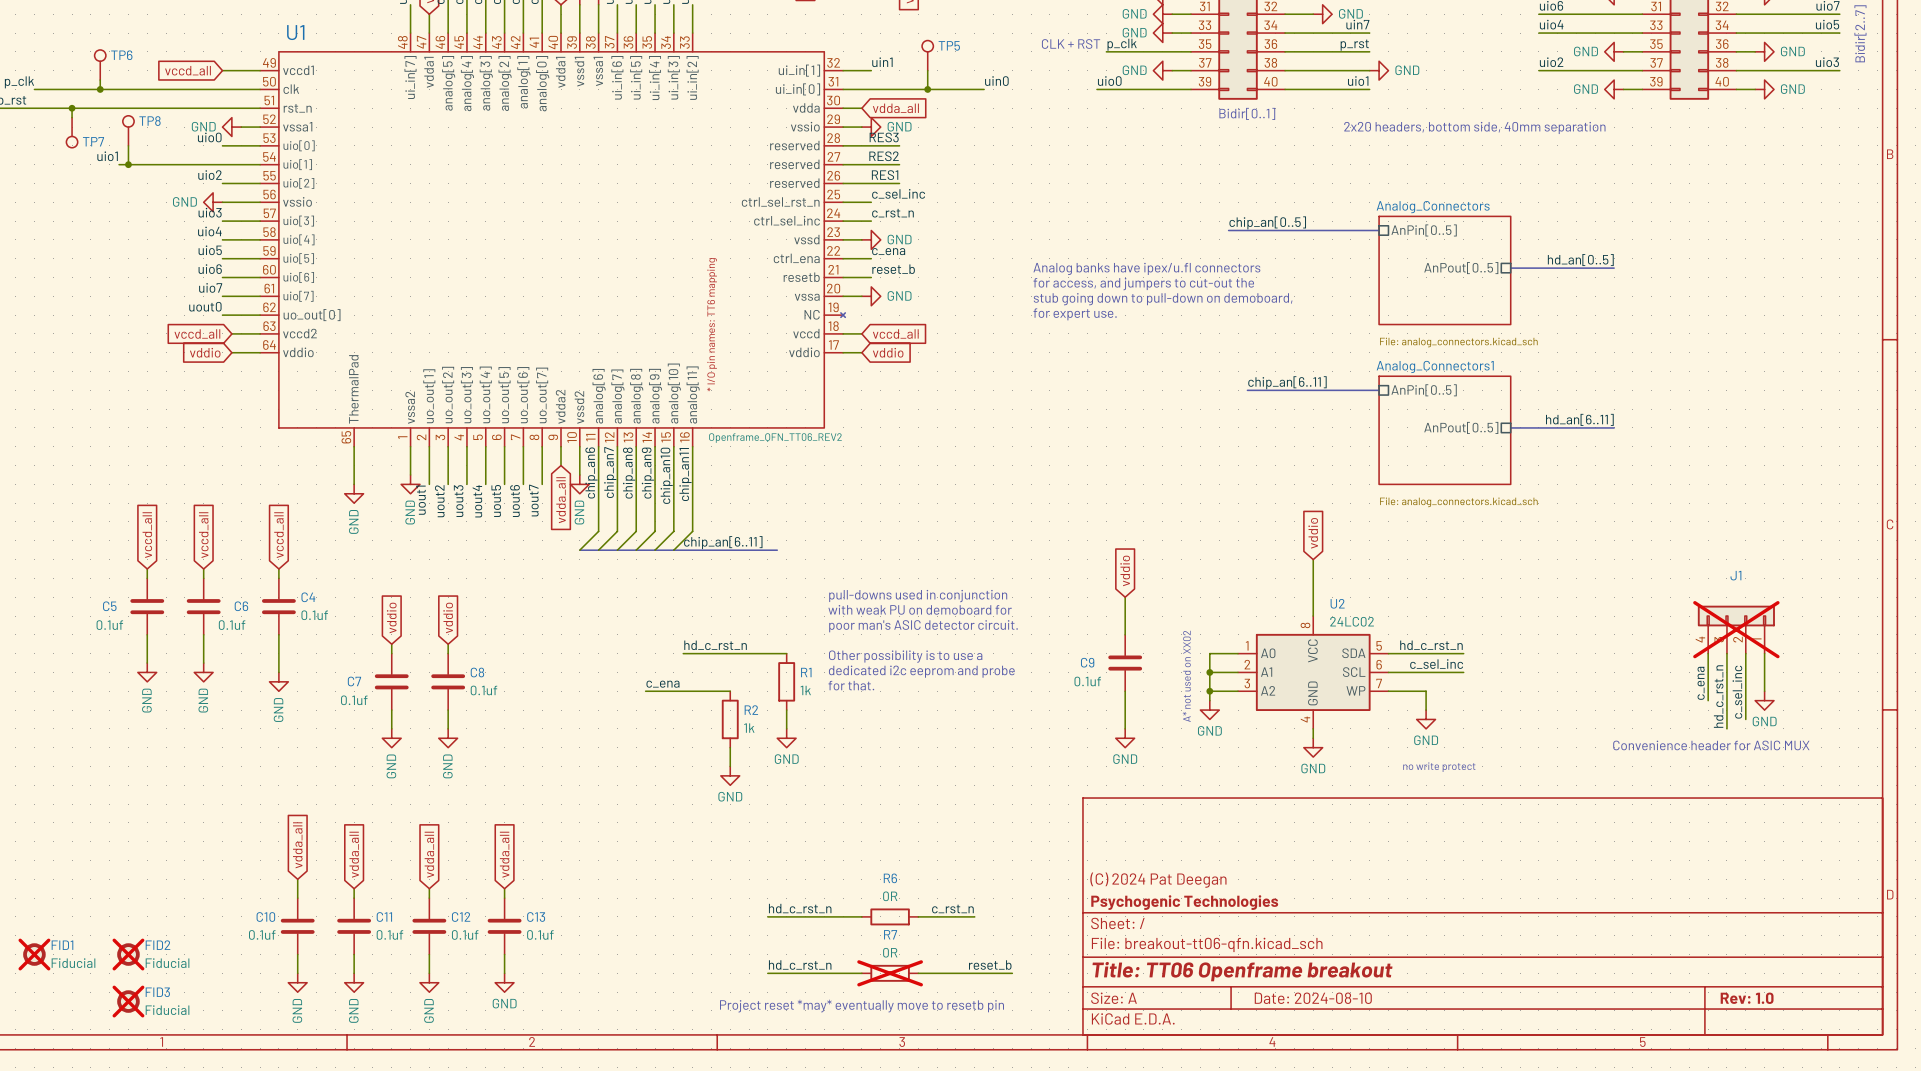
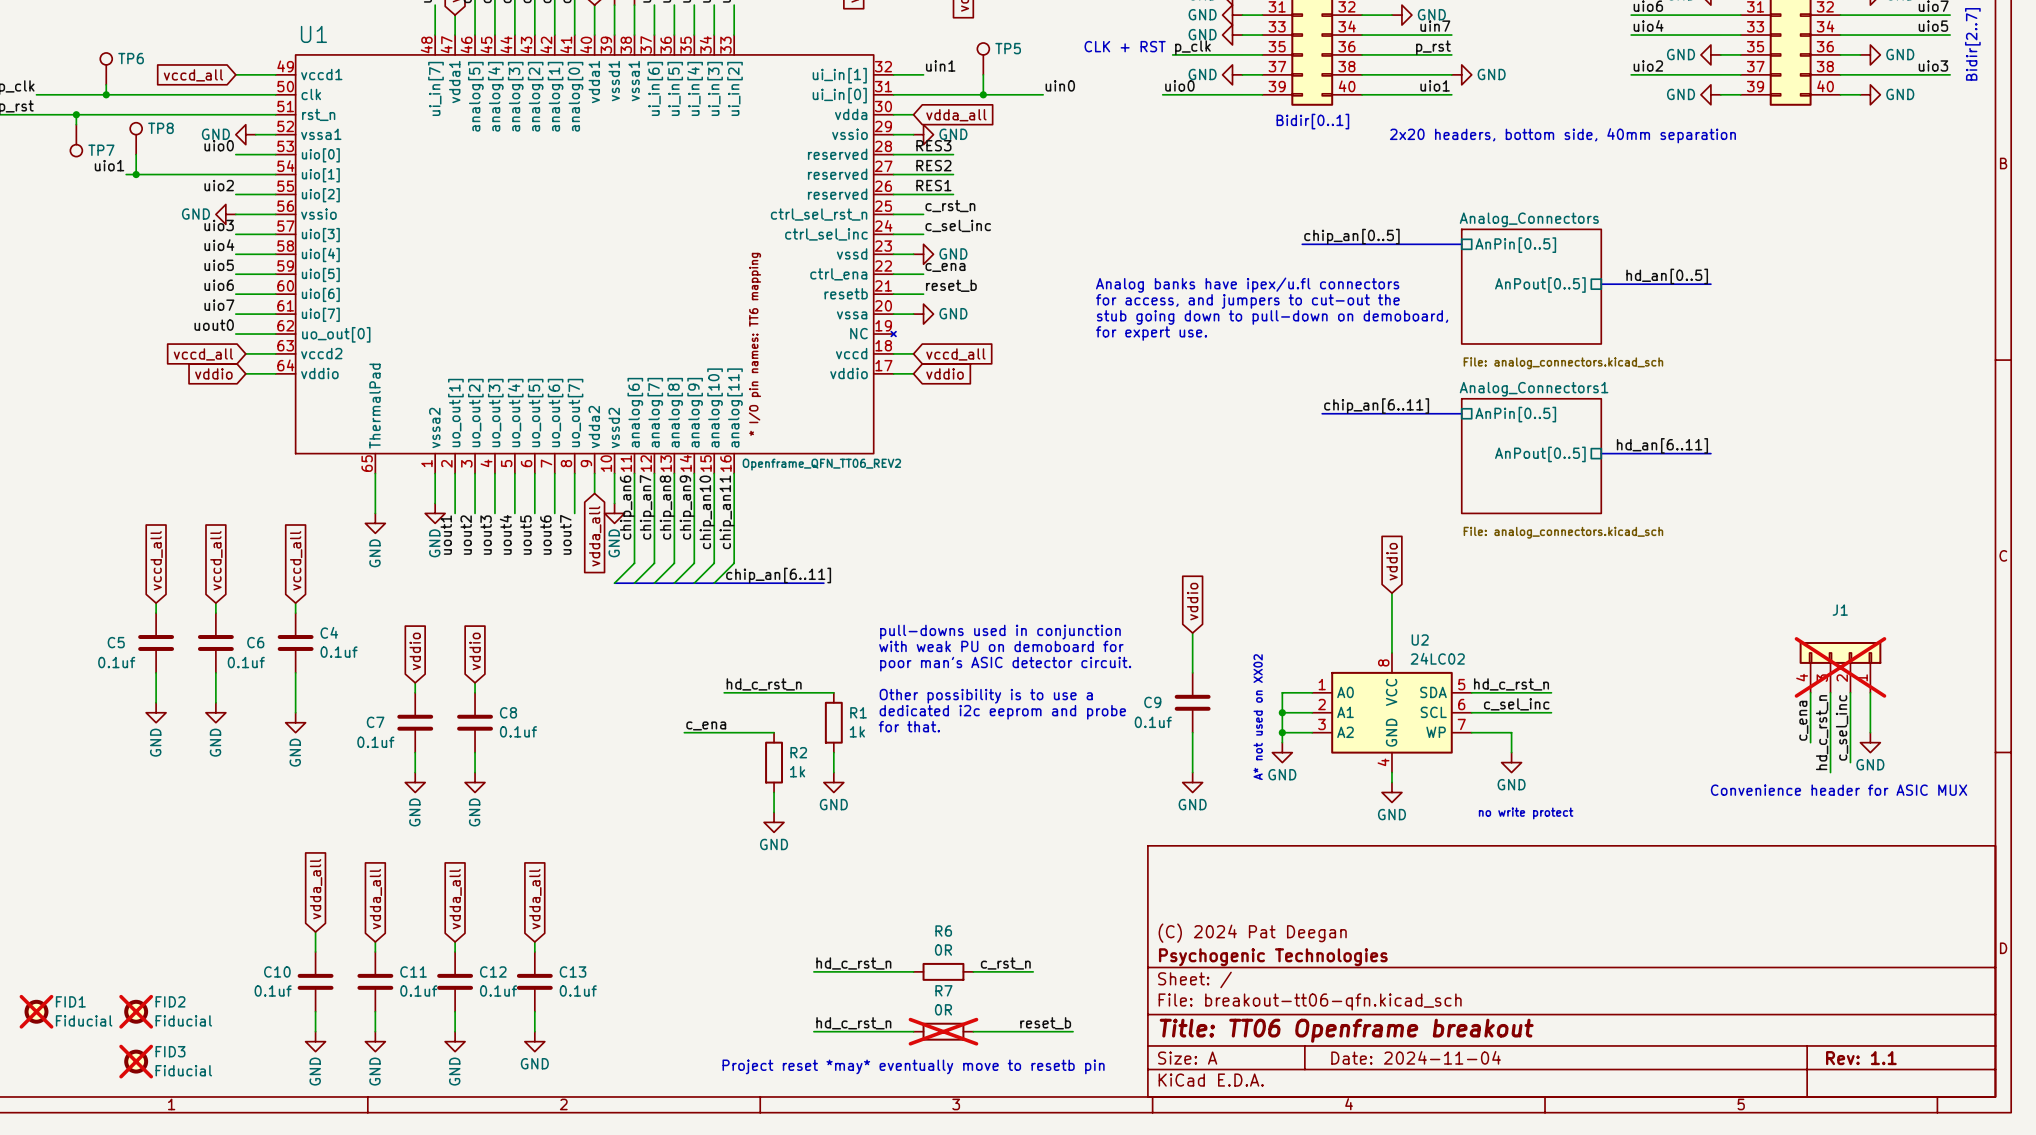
label: c_sel_inc (898, 193) -> c_rst_n (950, 205)
label: c_rst_n (892, 213) -> c_sel_inc (958, 225)
title block: Date: 2024-08-10 (1313, 998) -> Date: 2024-11-04 (1416, 1057)
title block: Rev: 1.0 (1747, 998) -> Rev: 1.1 (1861, 1058)

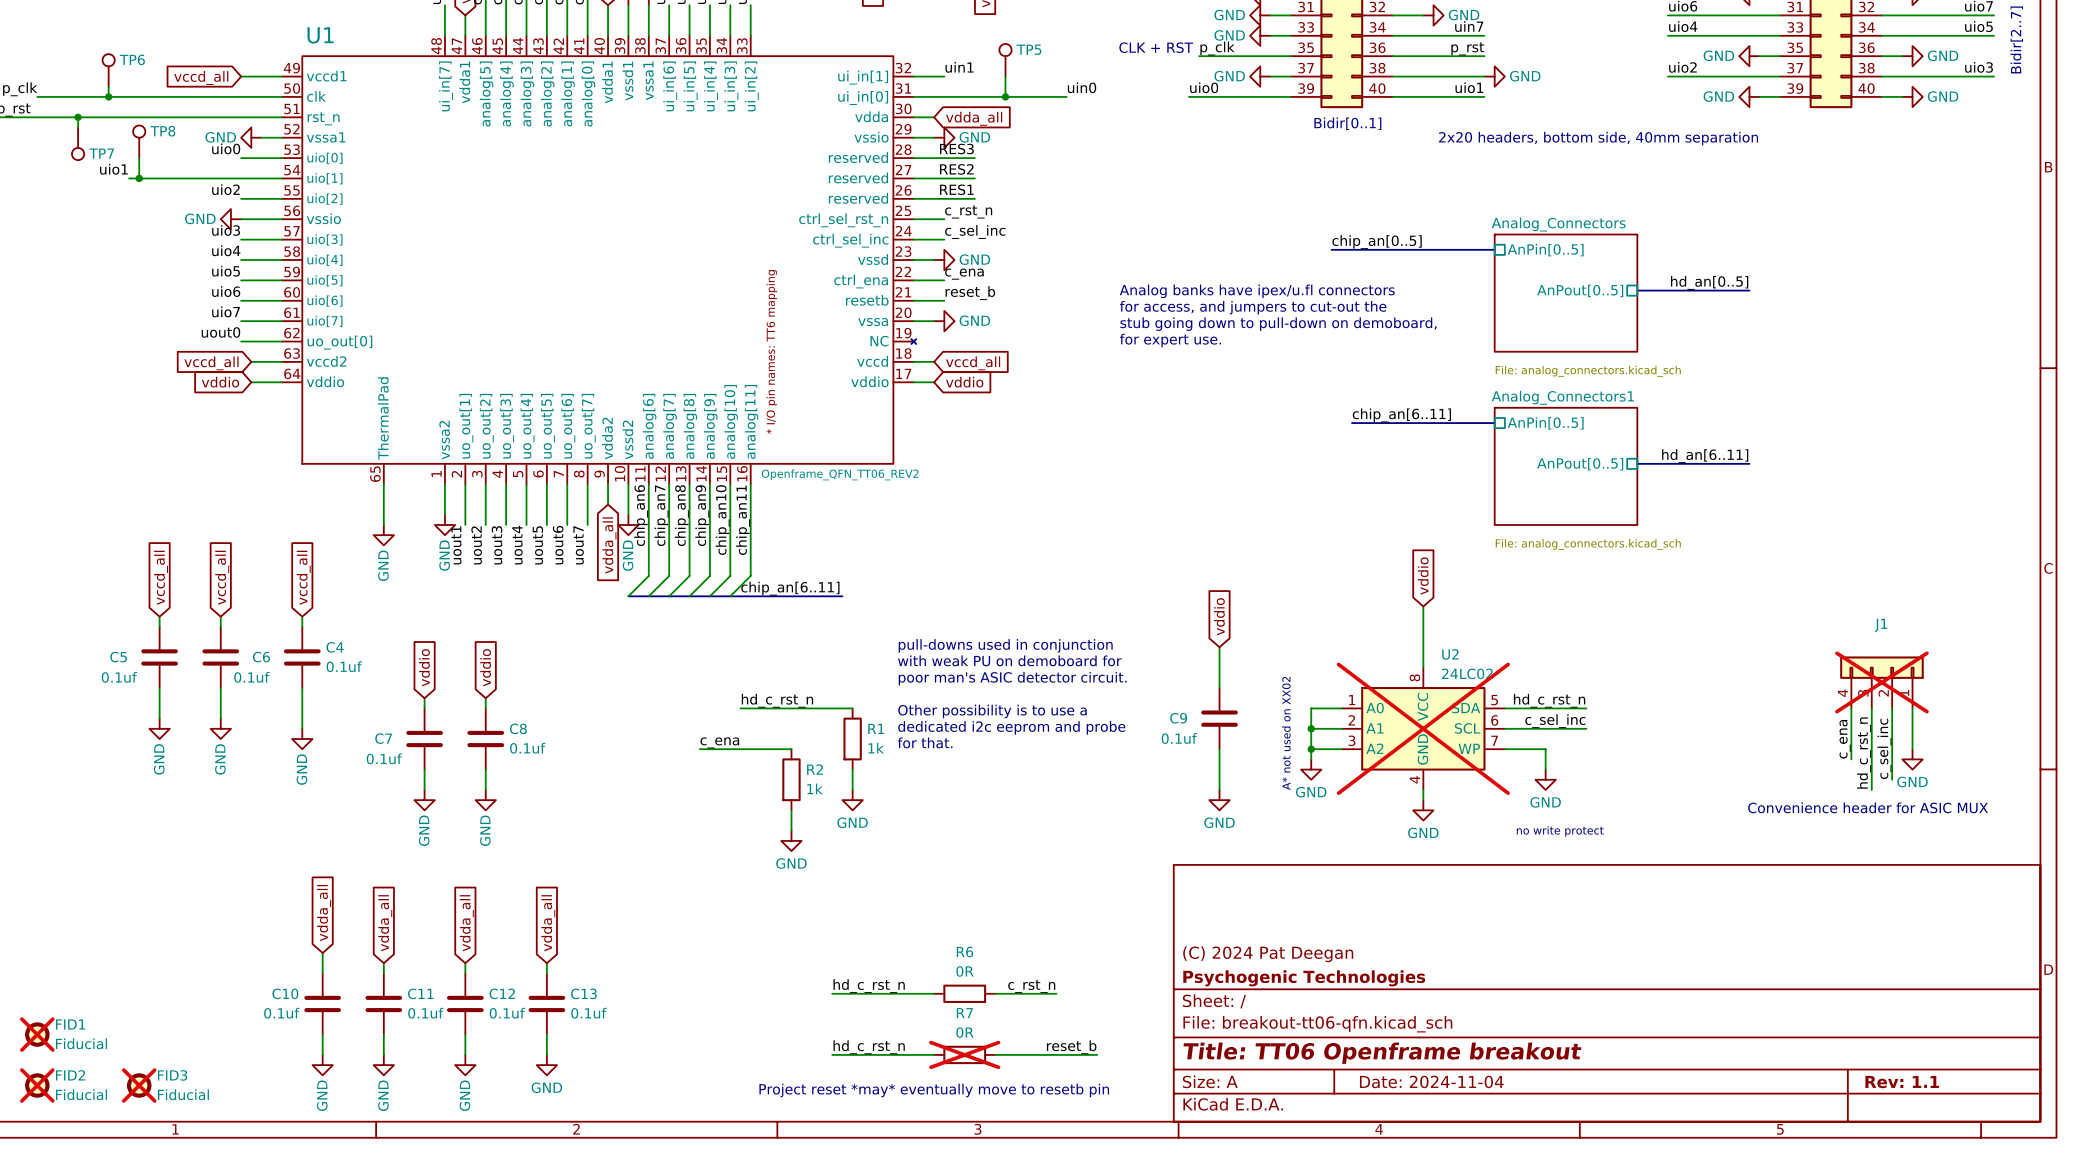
U2 do-not-place cross: none -> (1423, 728)
FID2 position: (136, 1011) -> (37, 1085)

